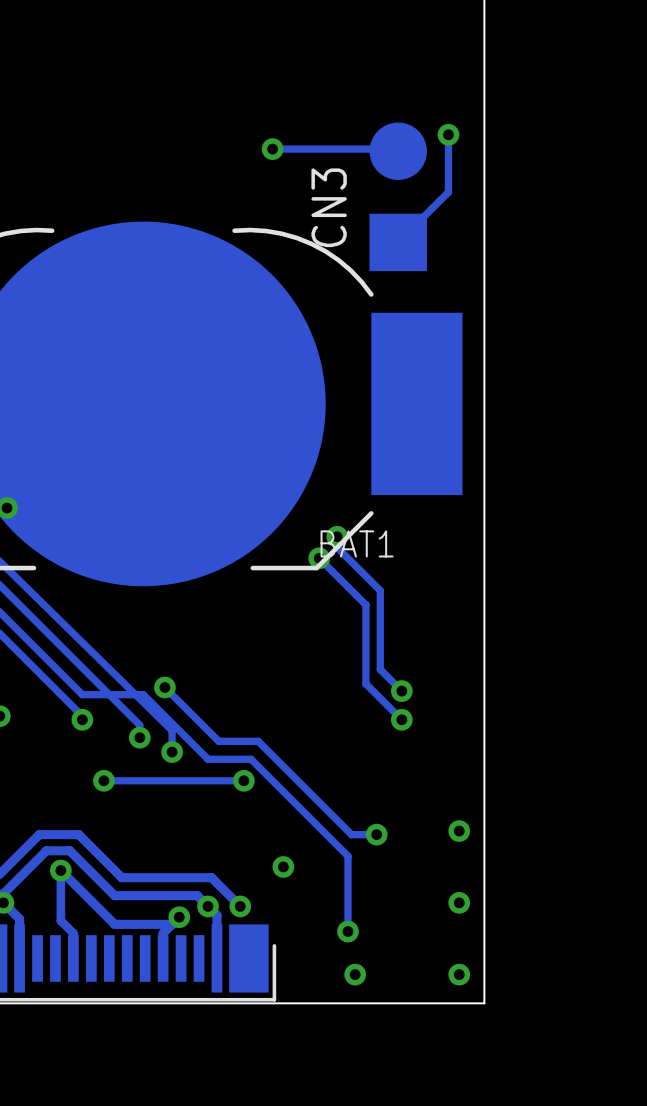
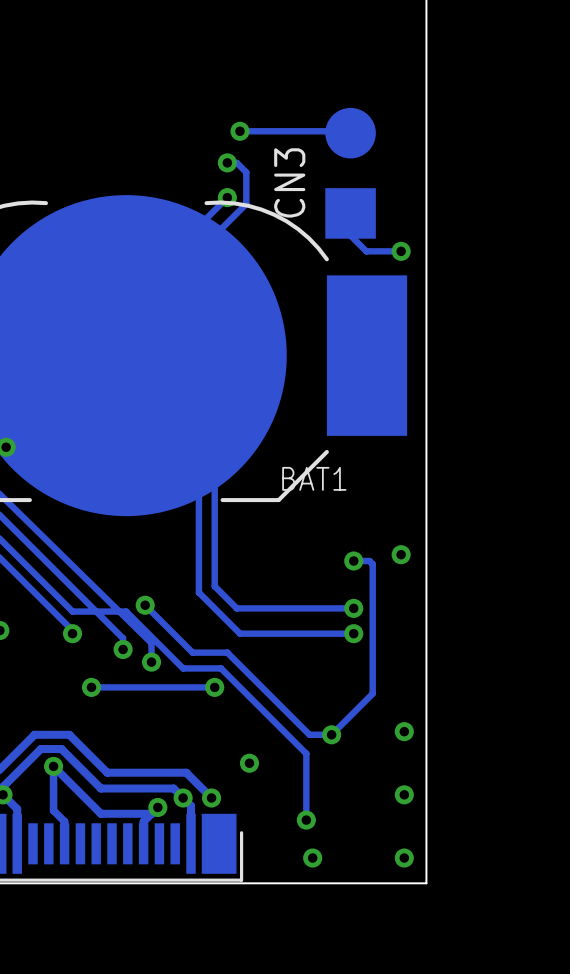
track: (448, 134) (448, 192) (398, 242) -> (401, 251) (366, 251) (350, 235) (350, 213)
via: (448, 134) -> none
via: none -> (227, 162)
via: none -> (227, 197)
via: none -> (401, 251)
track: (337, 536) (337, 547) (380, 590) (380, 669) (401, 691) -> (227, 162) (236, 162) (246, 172) (246, 203) (214, 235) (214, 586) (236, 608) (353, 608)
via: (337, 536) -> none
track: (319, 558) (365, 604) (365, 683) (401, 719) -> (227, 197) (198, 226) (198, 592) (239, 633) (353, 633)
via: (319, 558) -> none
via: none -> (401, 554)
track: none -> (353, 561) (369, 561) (372, 564) (372, 693) (331, 734)
via: none -> (353, 561)

